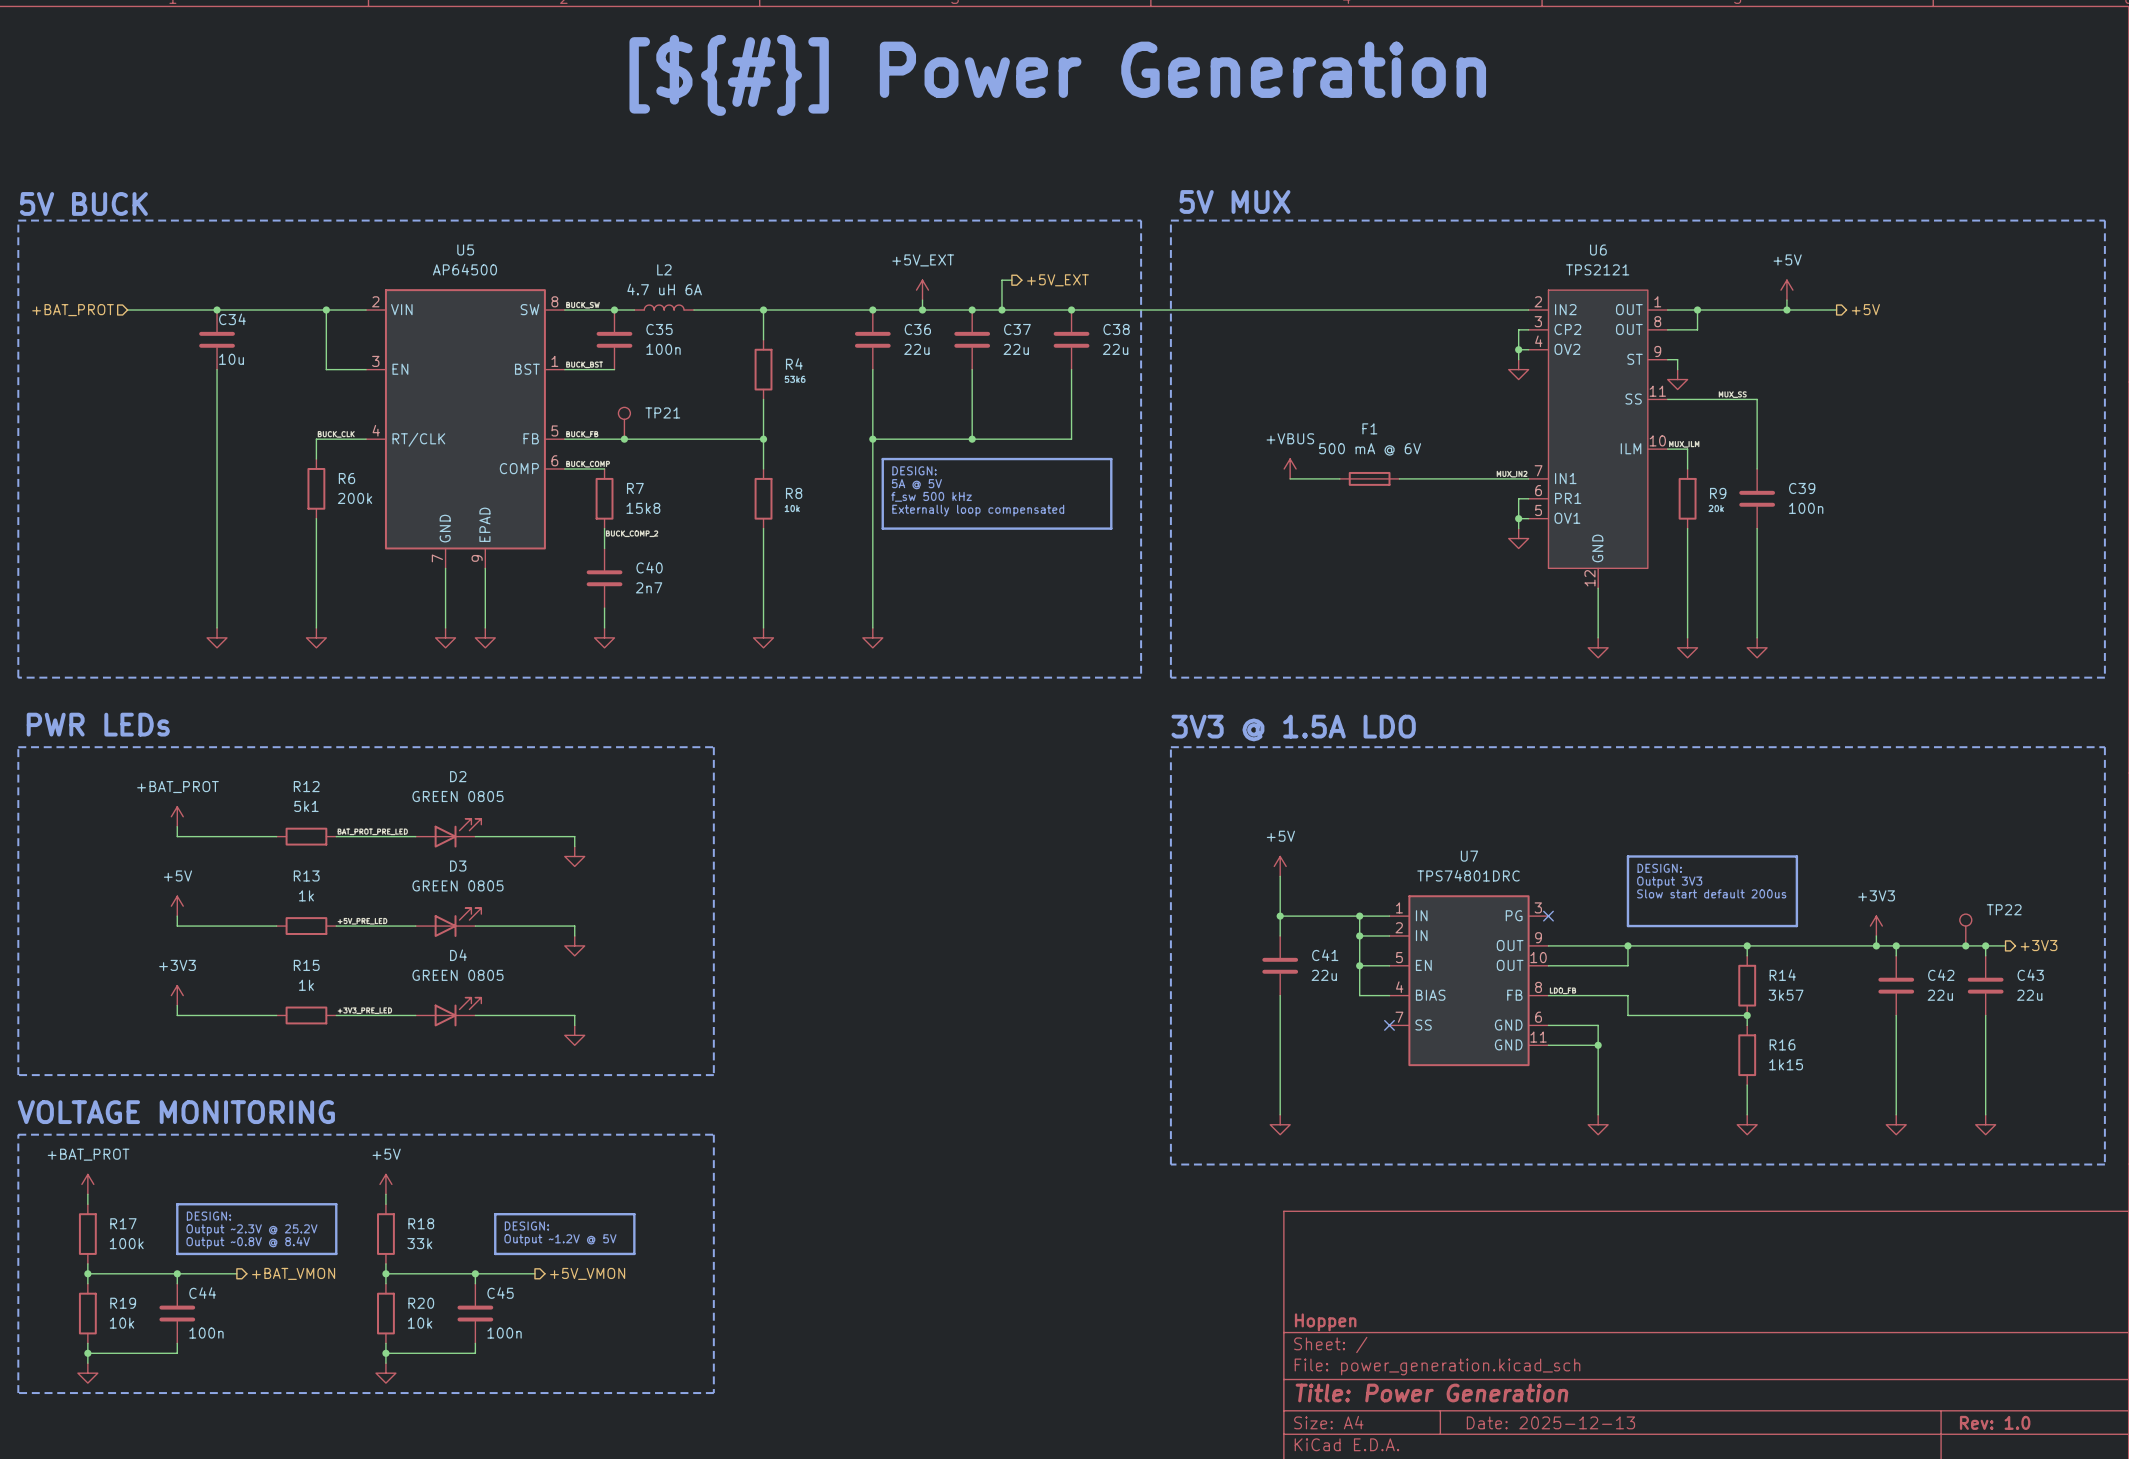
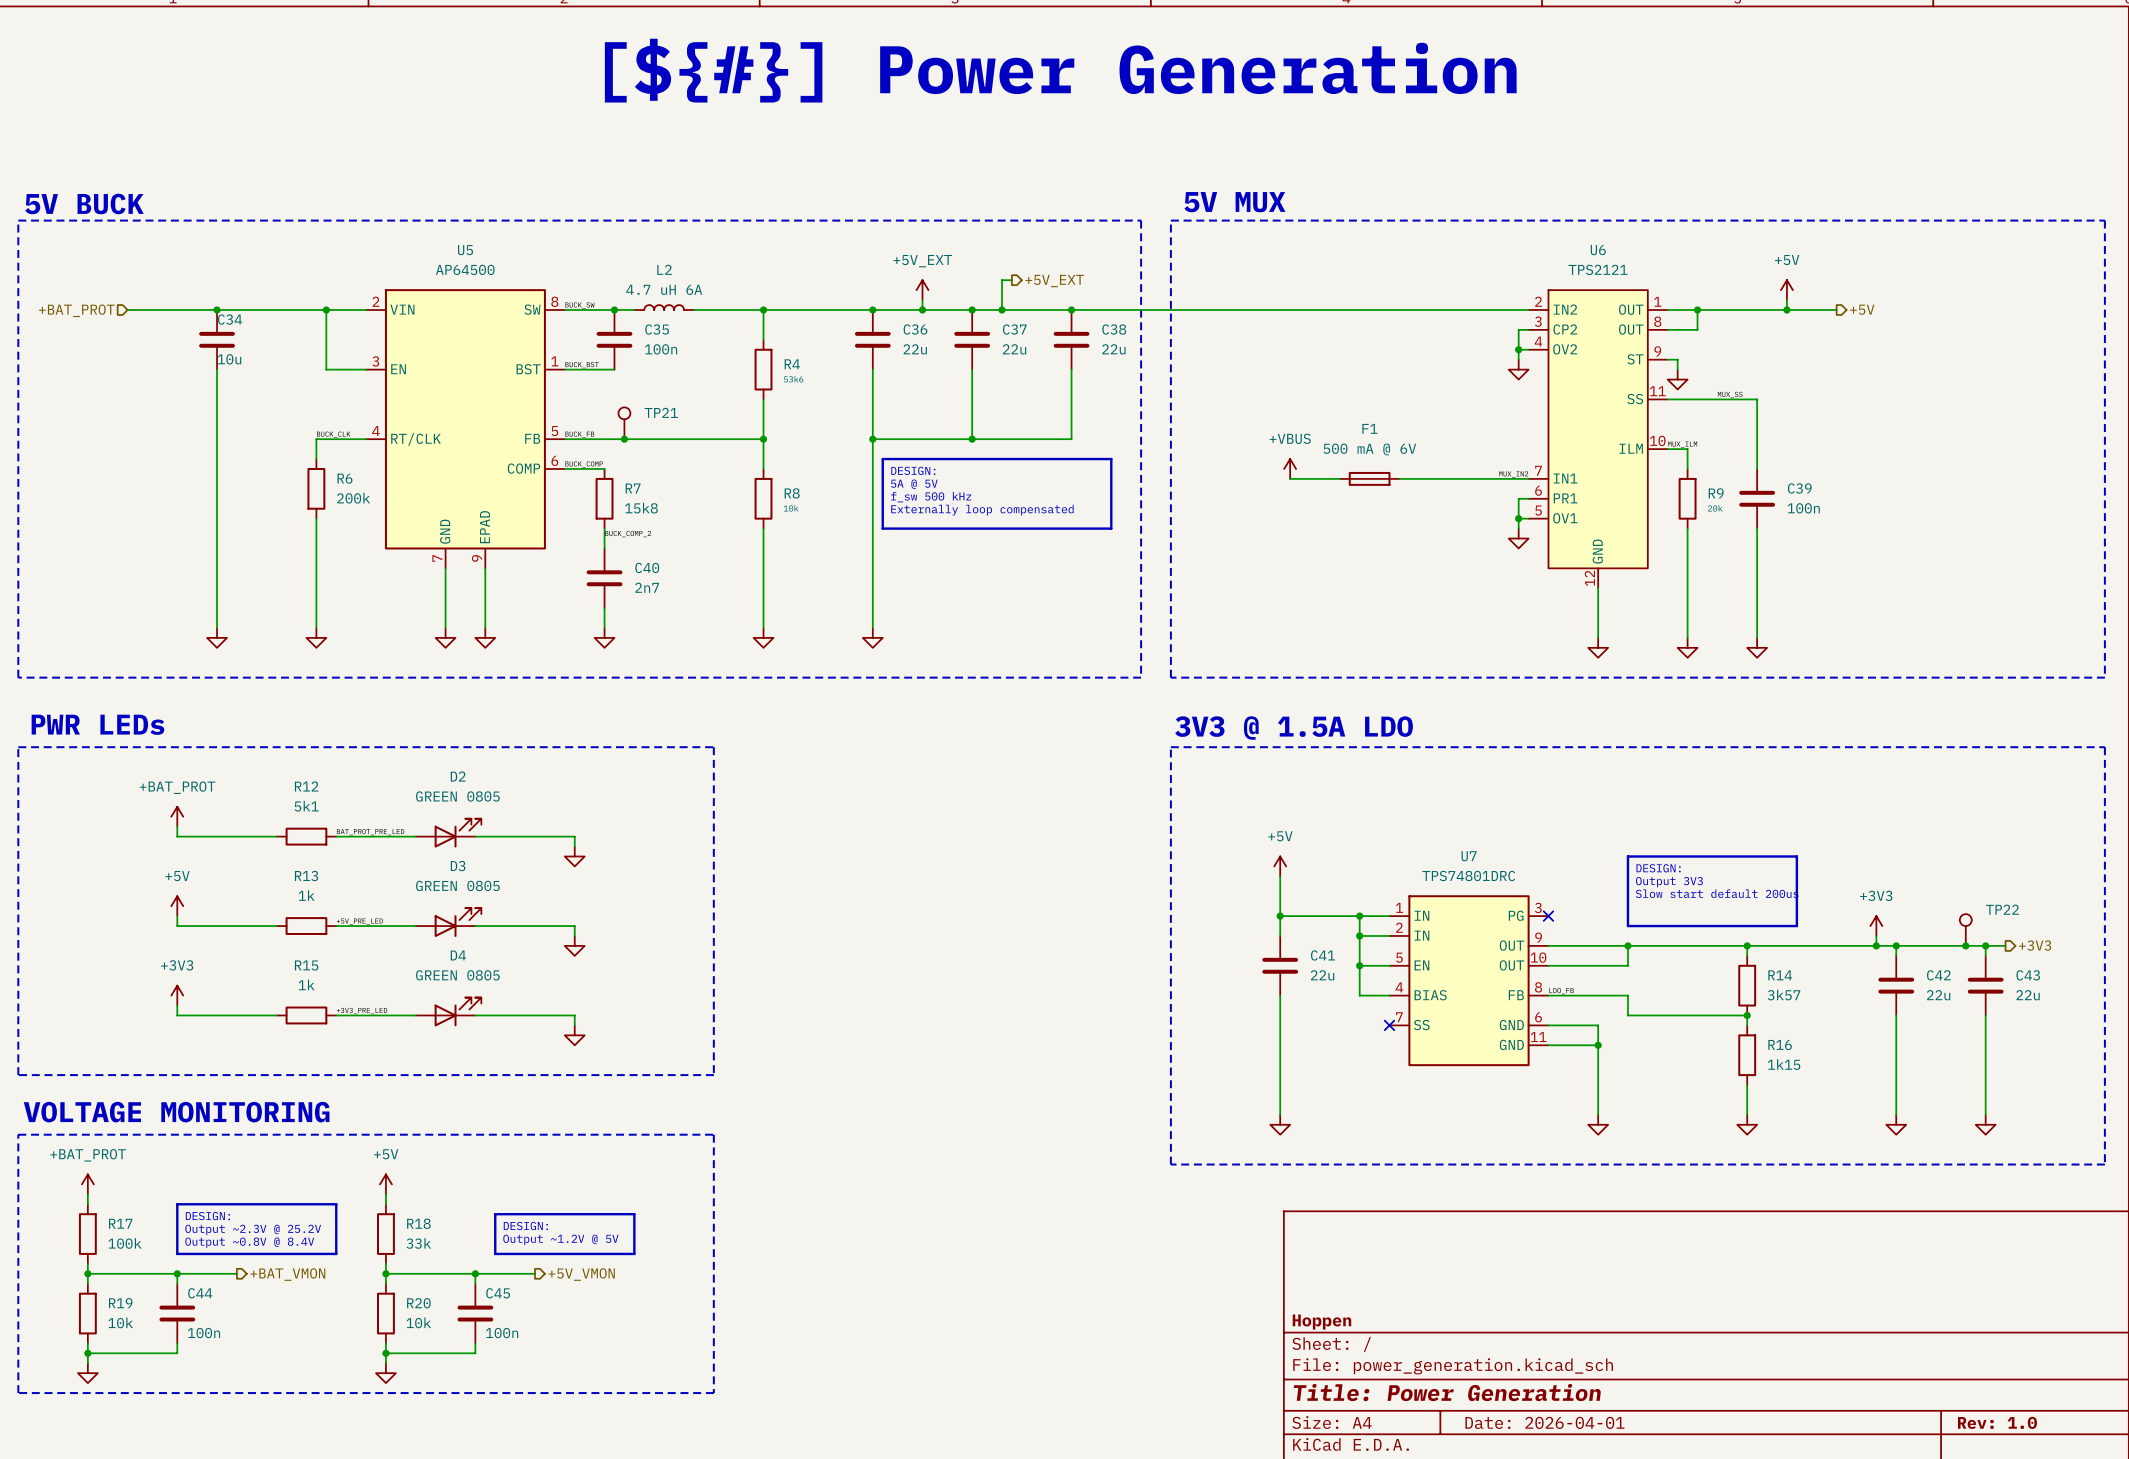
title block: Date: 2025-12-13 (1550, 1422) -> Date: 2026-04-01 (1544, 1422)

